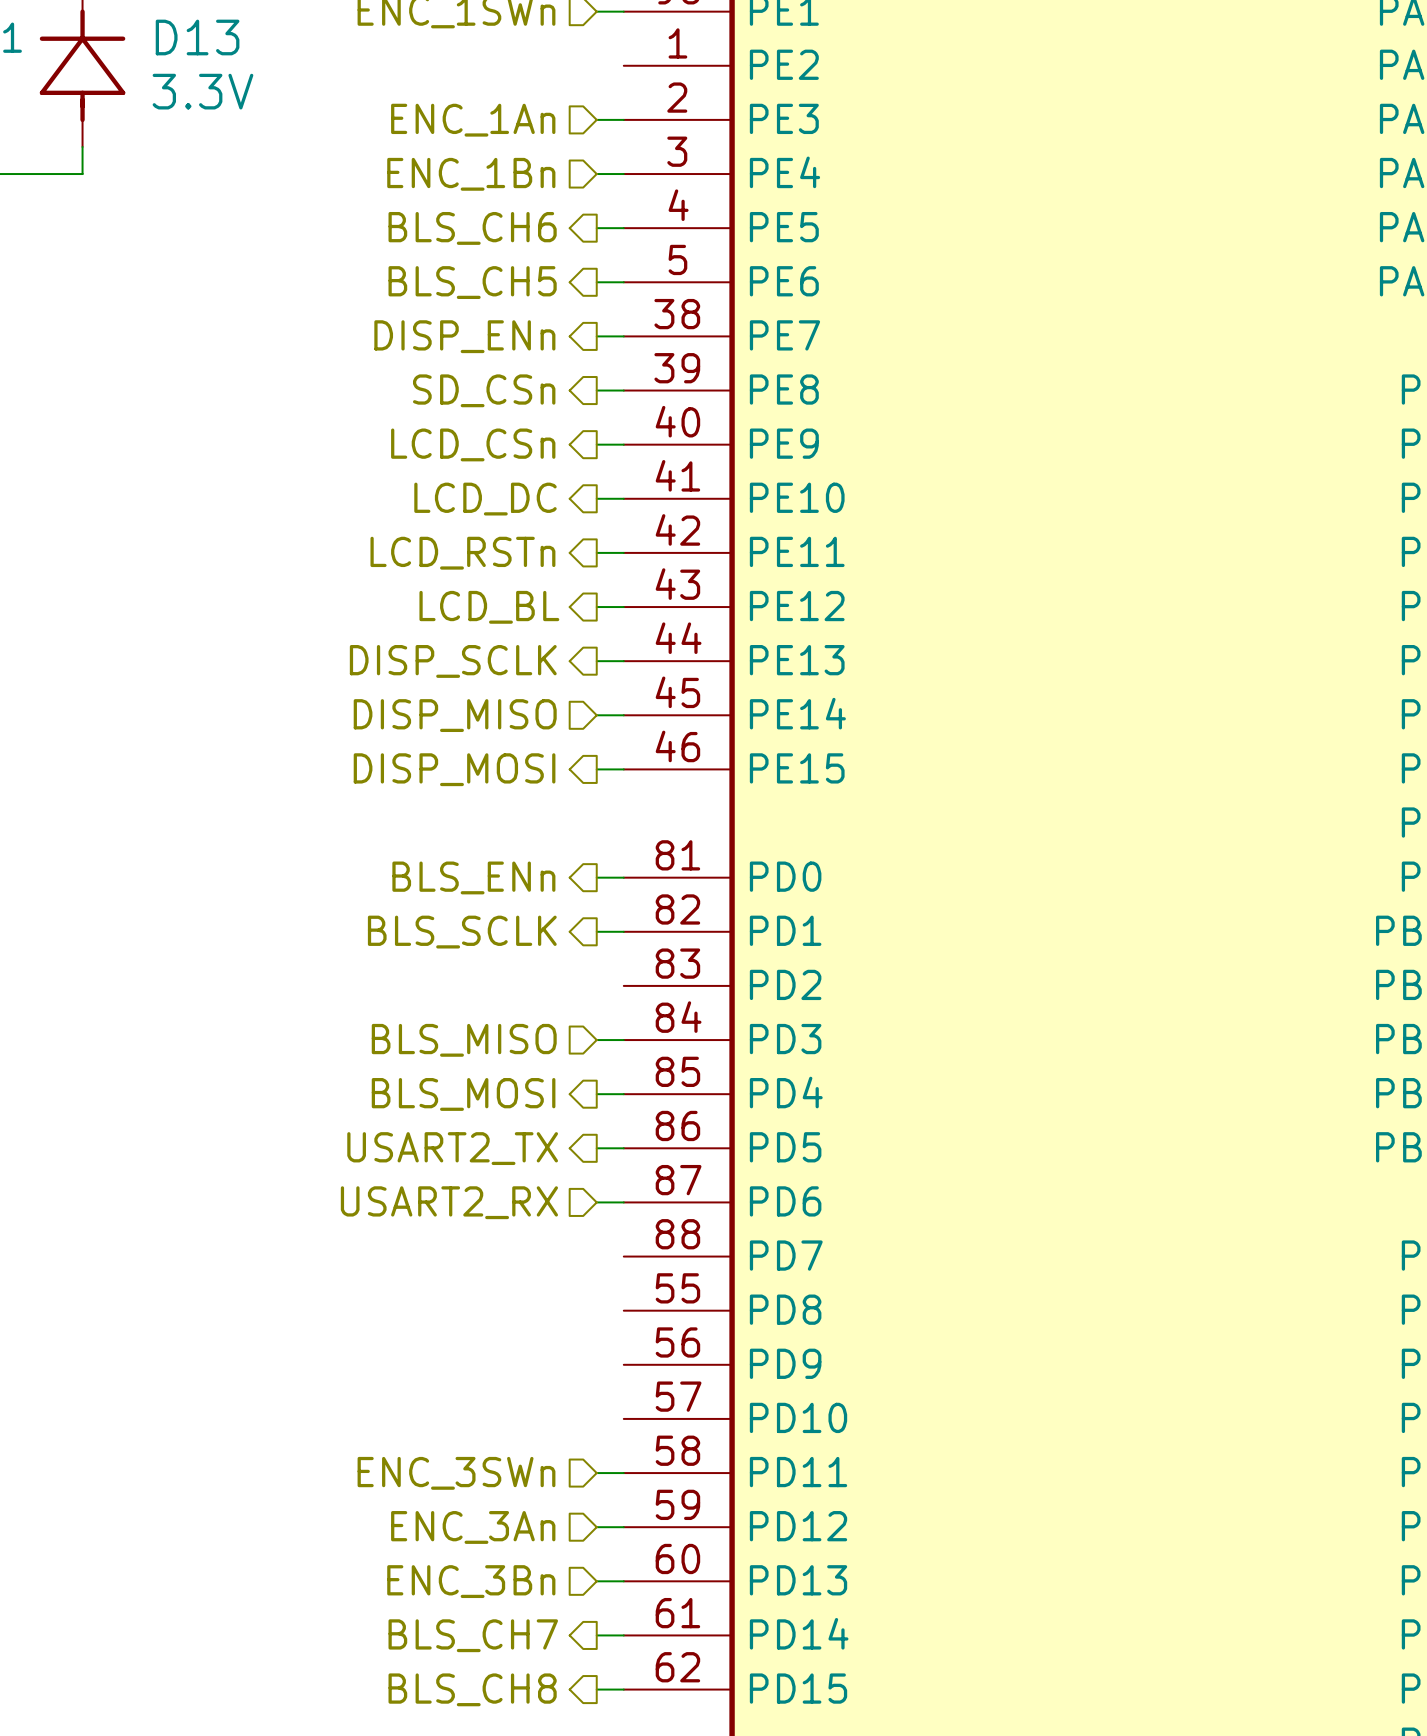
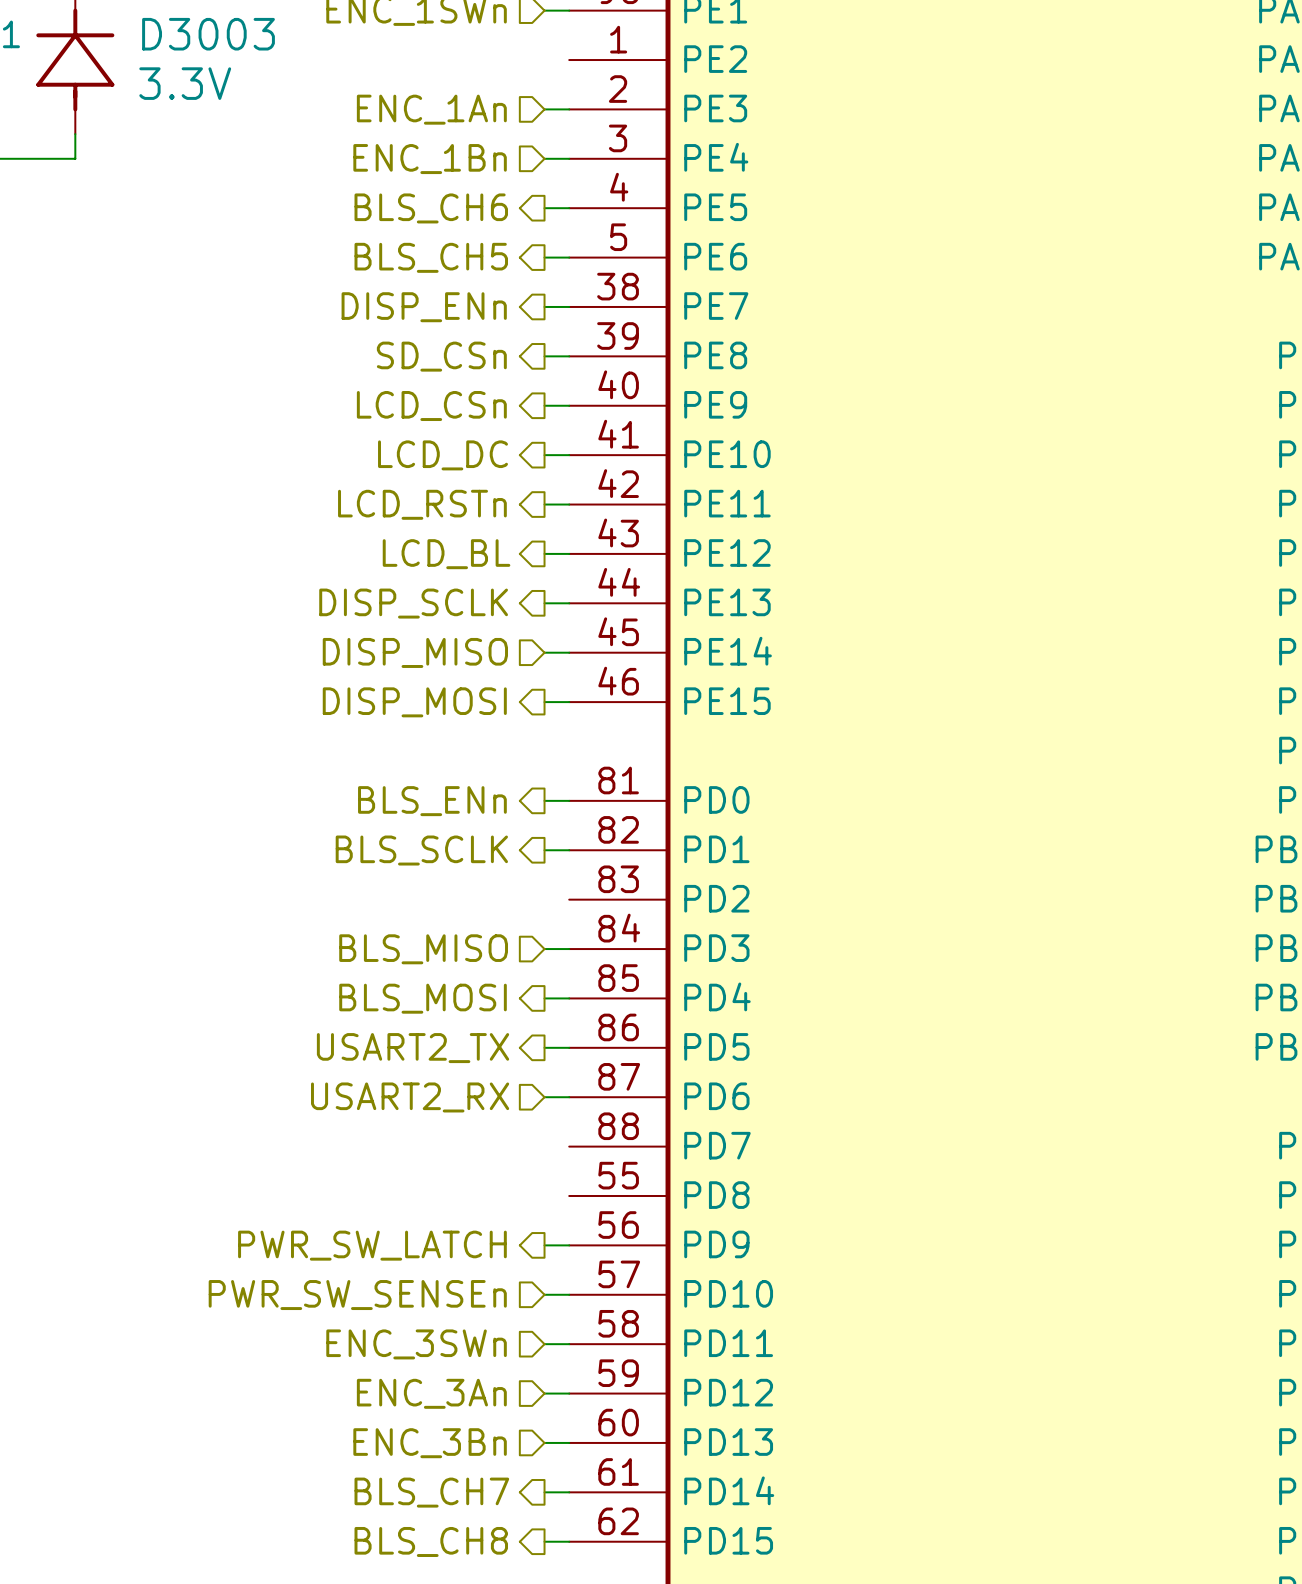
D13 name: D13 (197, 37) -> D3003 (208, 34)
wire: none -> (544, 1245) (569, 1245)
hierarchical label: none -> PWR_SW_LATCH (372, 1245)
wire: none -> (544, 1294) (569, 1294)
hierarchical label: none -> PWR_SW_SENSEn (357, 1295)

